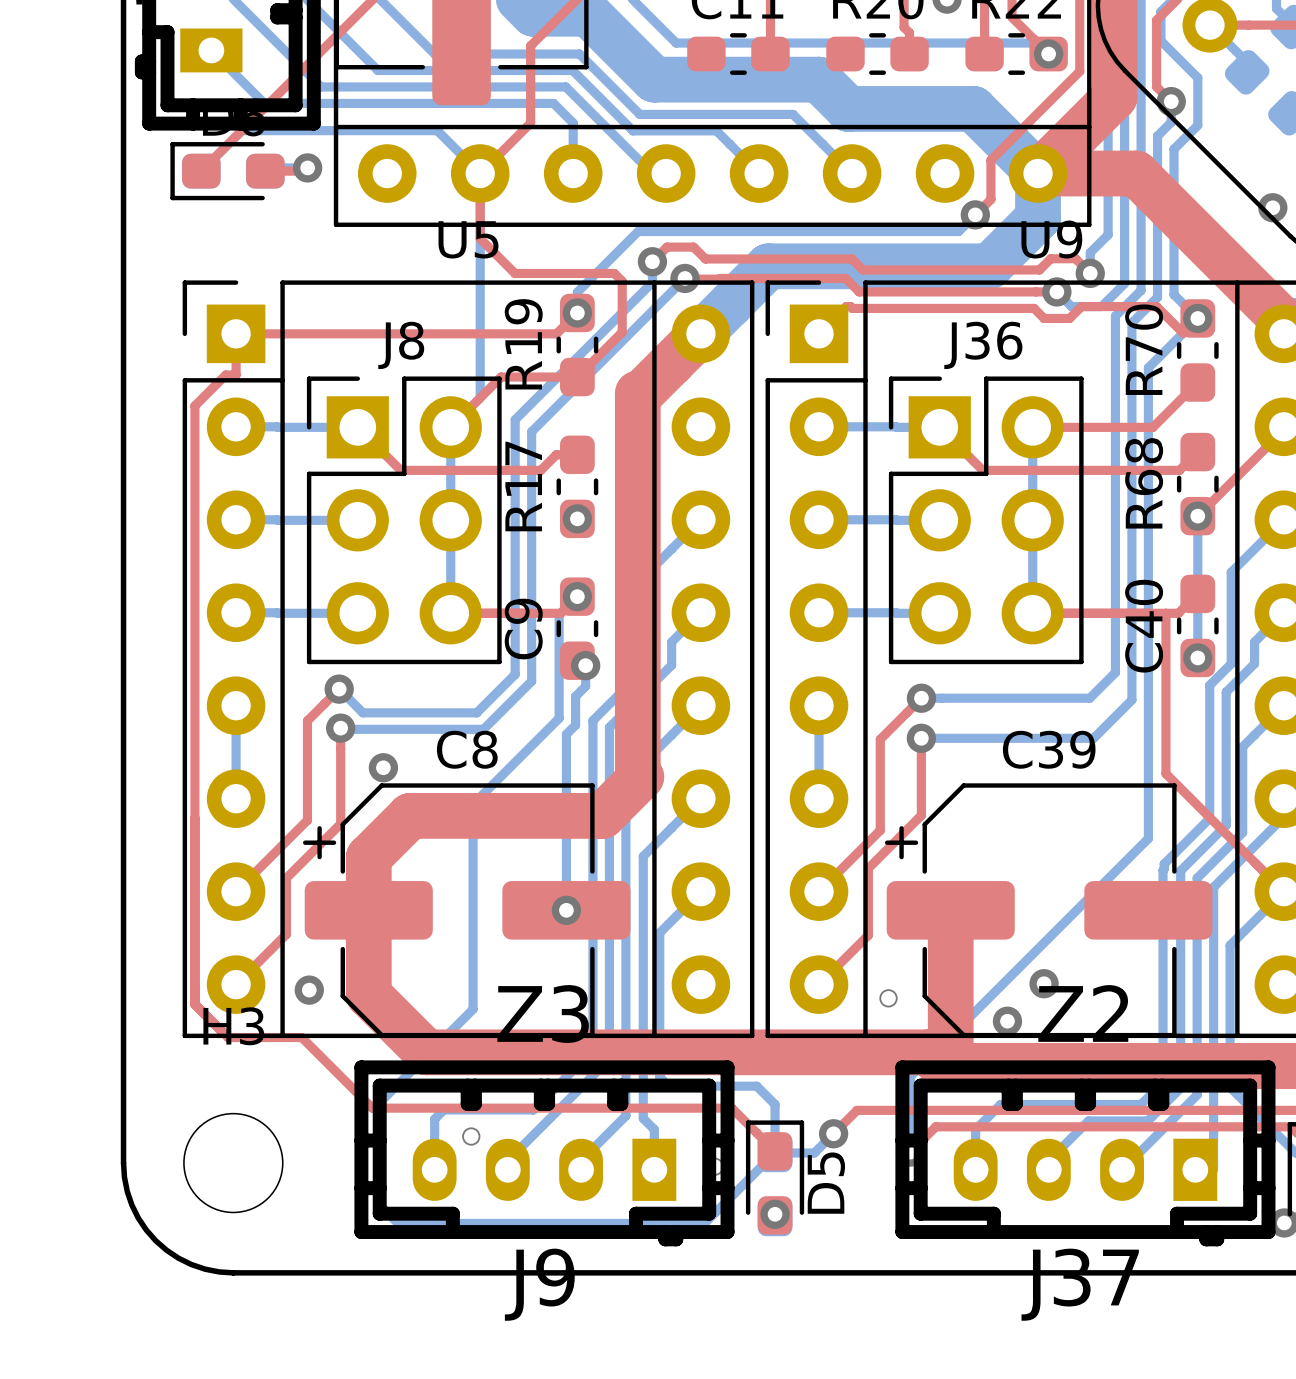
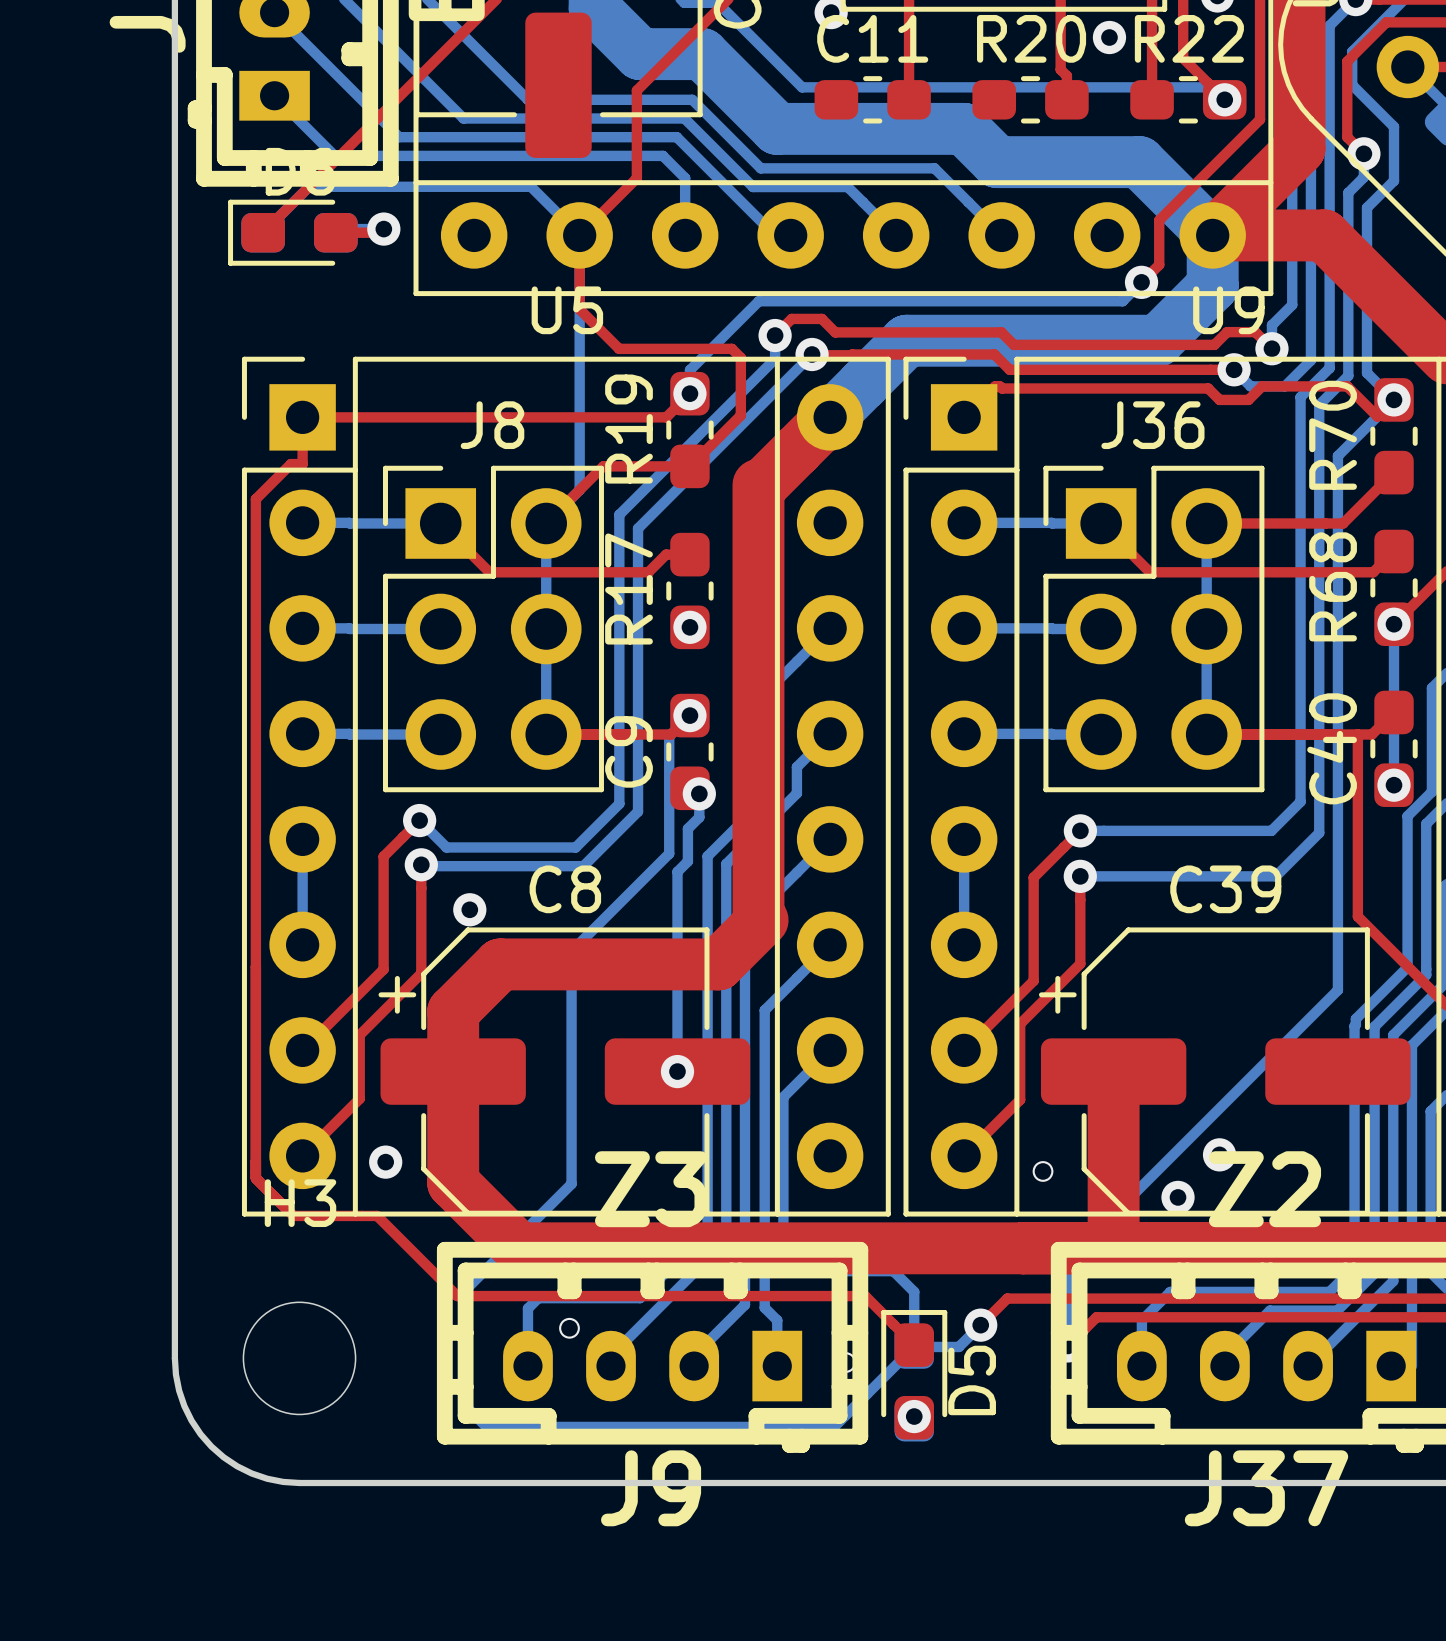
top track: (368, 994) (426, 1052) (928, 1052) (942, 1066) -> (453, 1167) (453, 1182) (518, 1248) (1103, 1248)

